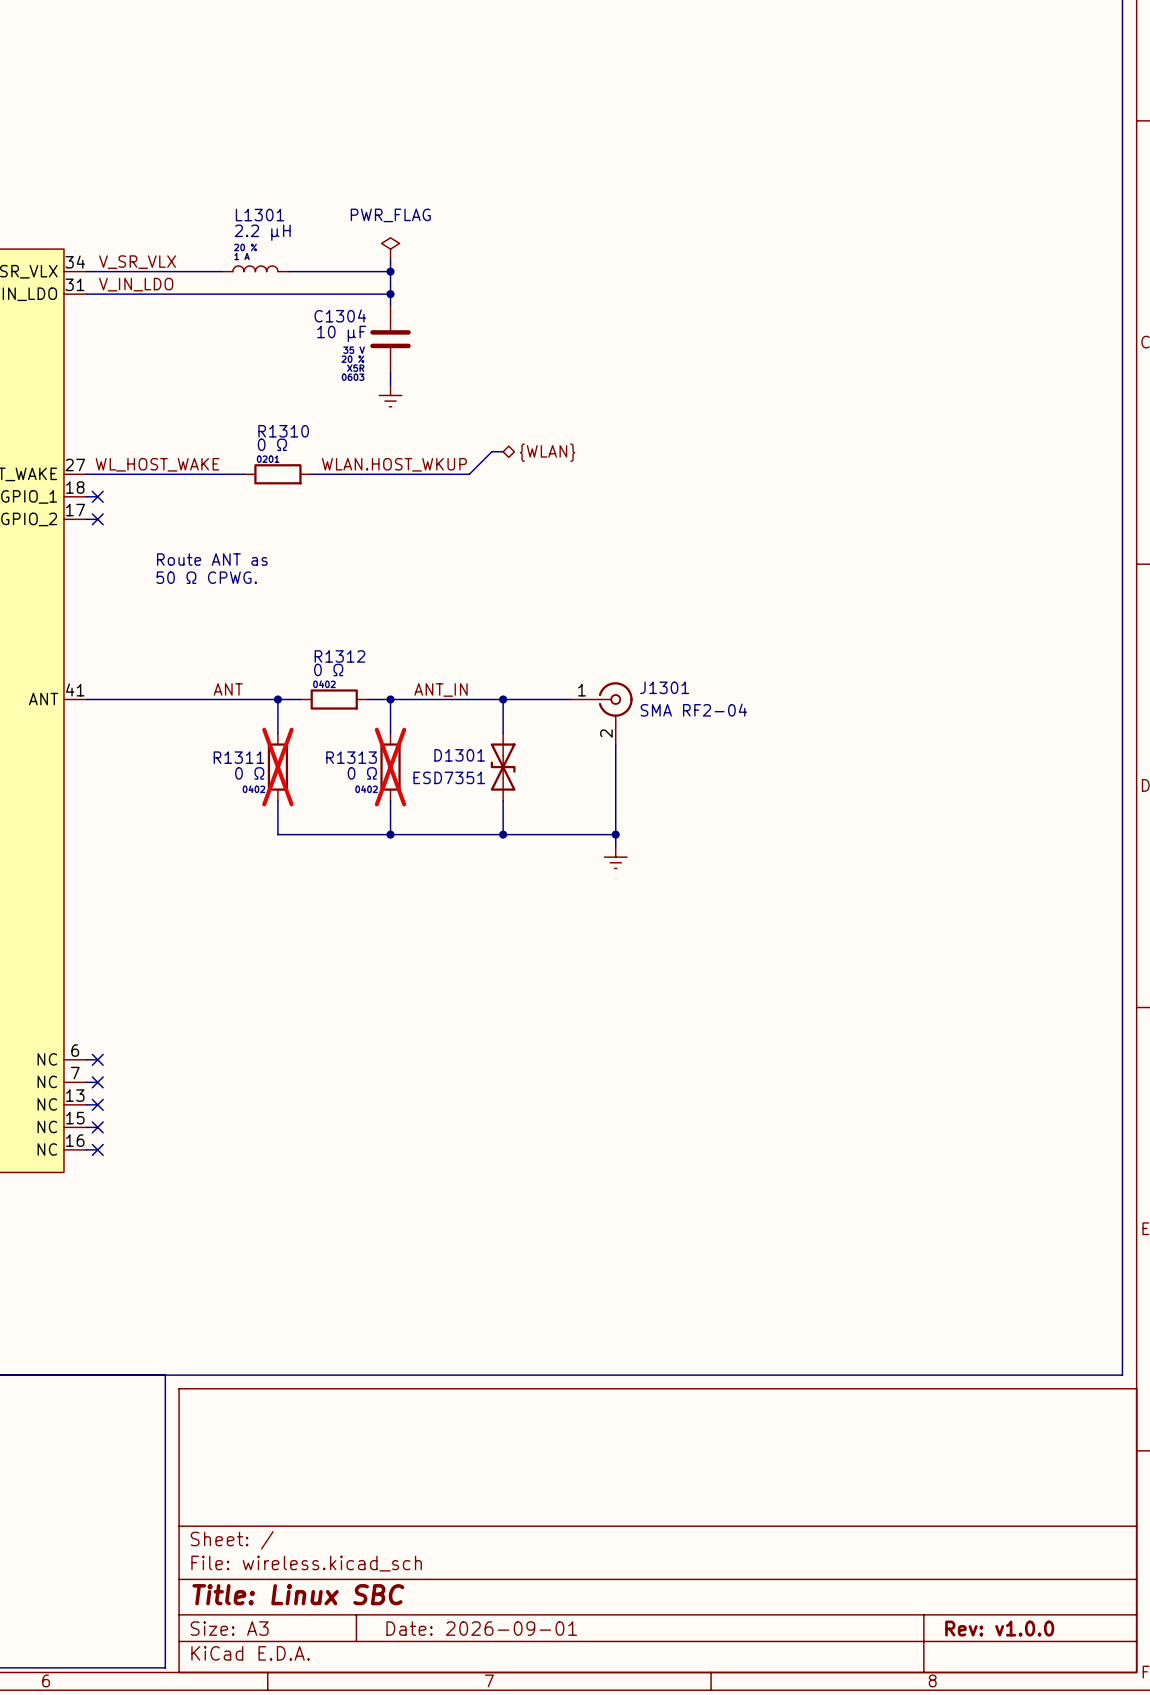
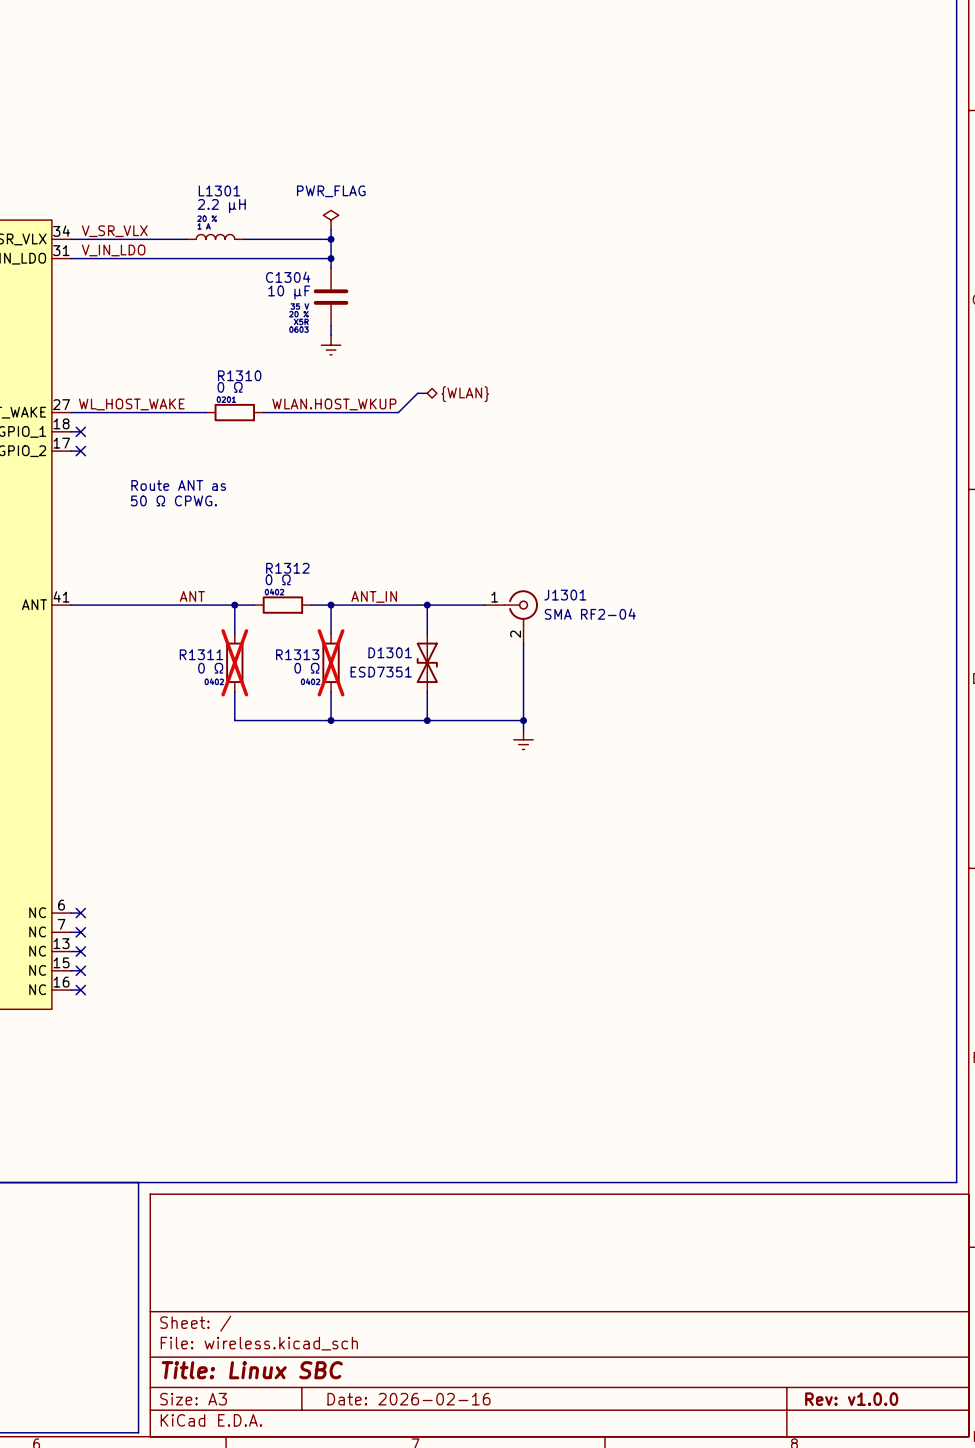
title block: Date: 2026-09-01 (481, 1628) -> Date: 2026-02-16 (408, 1399)

